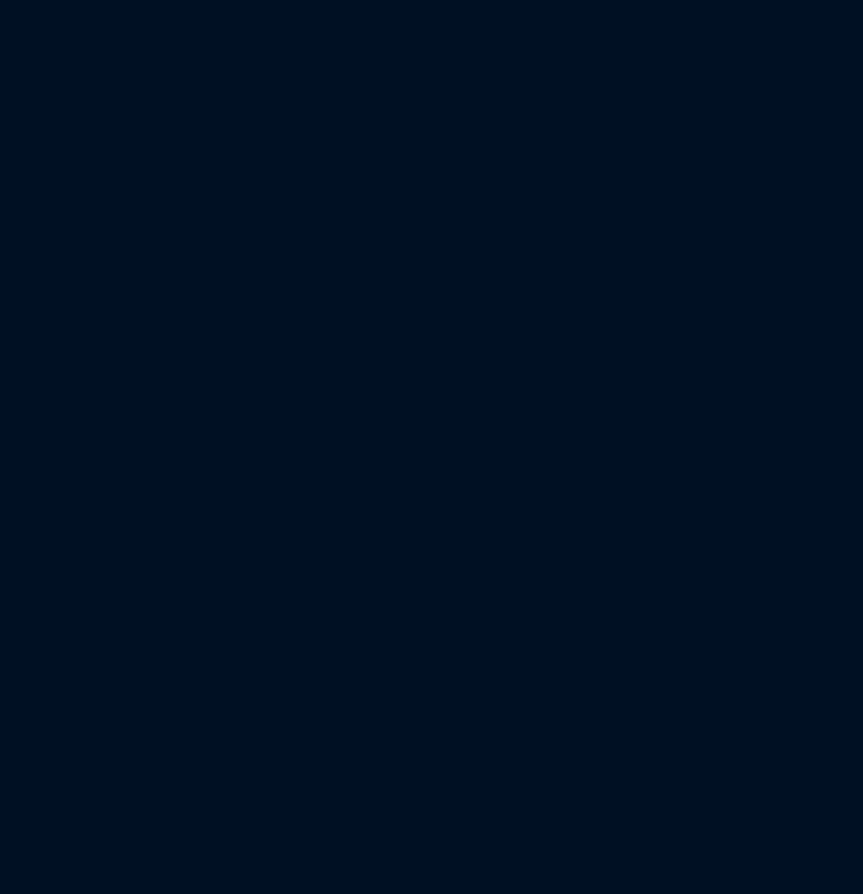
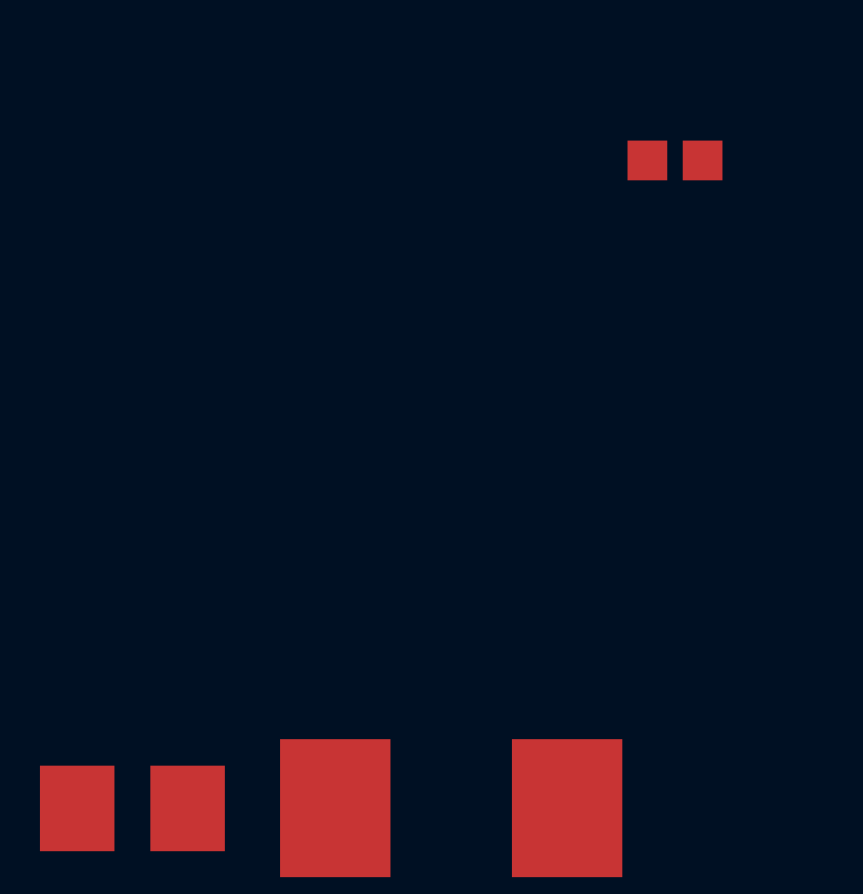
part: none -> (674, 160)
part: none -> (132, 808)
part: none -> (451, 808)

